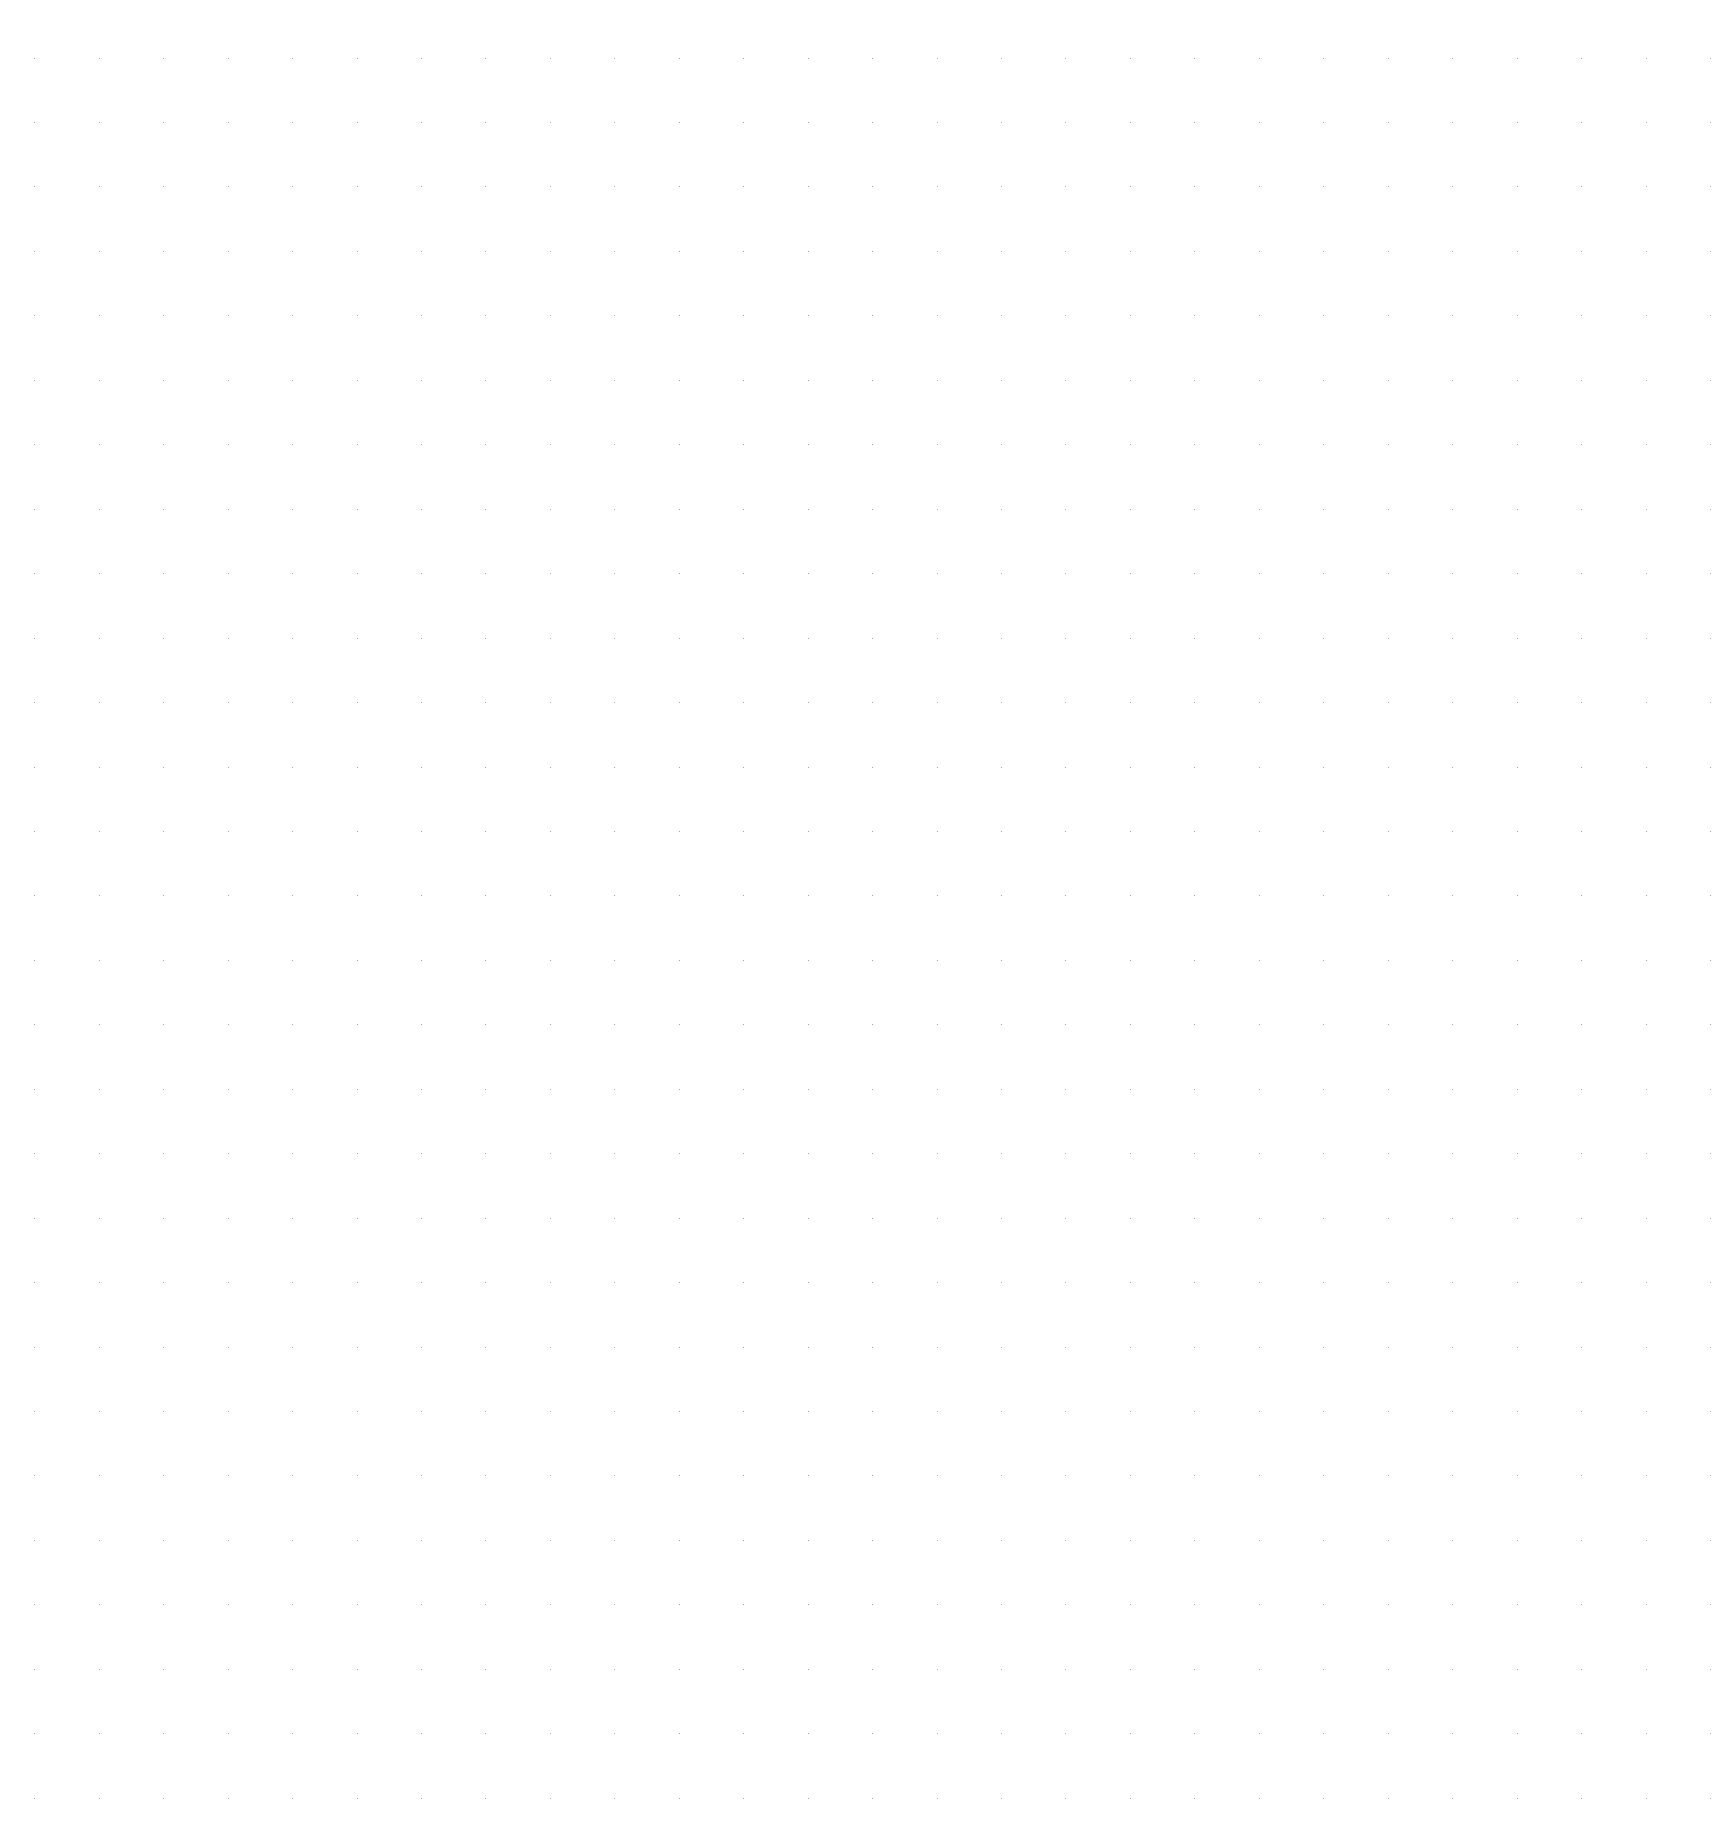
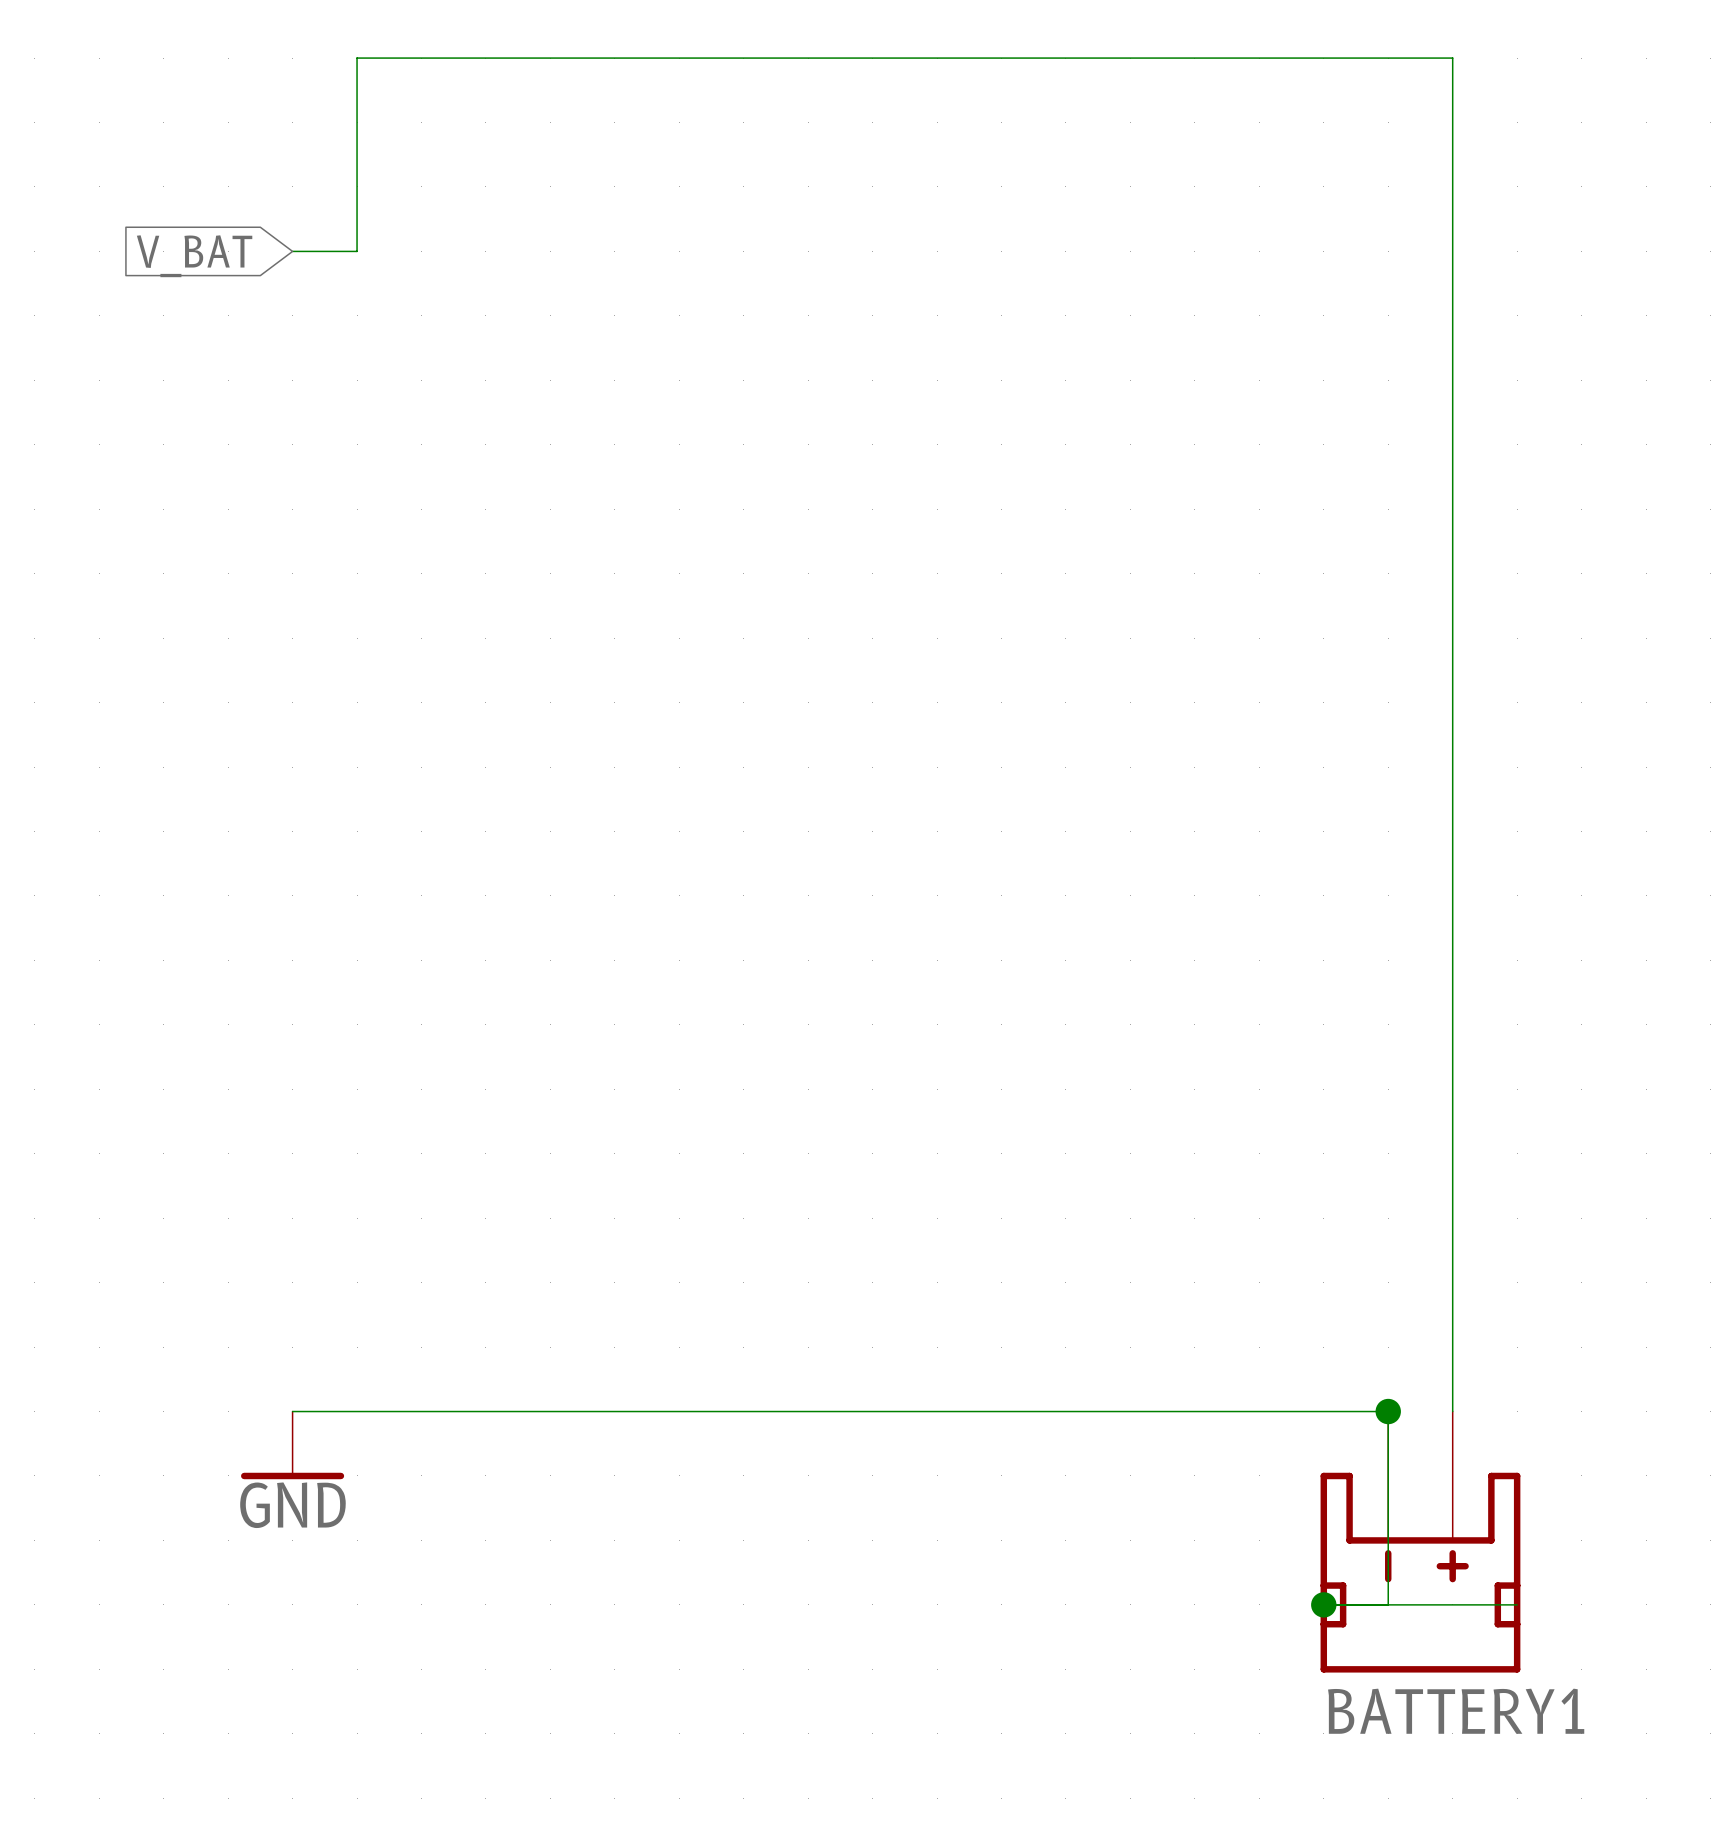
wire: none -> (292, 251) (357, 251) (357, 58) (1452, 58) (1452, 1411)
global label: none -> V_BAT (194, 256)
wire: none -> (292, 1411) (1388, 1411) (1388, 1604)
junction: none -> (1388, 1411)
power symbol: none -> GND (292, 1445)
BATTERY1: none -> (1420, 1542)
wire: none -> (1323, 1604) (1517, 1604)
junction: none -> (1323, 1604)

